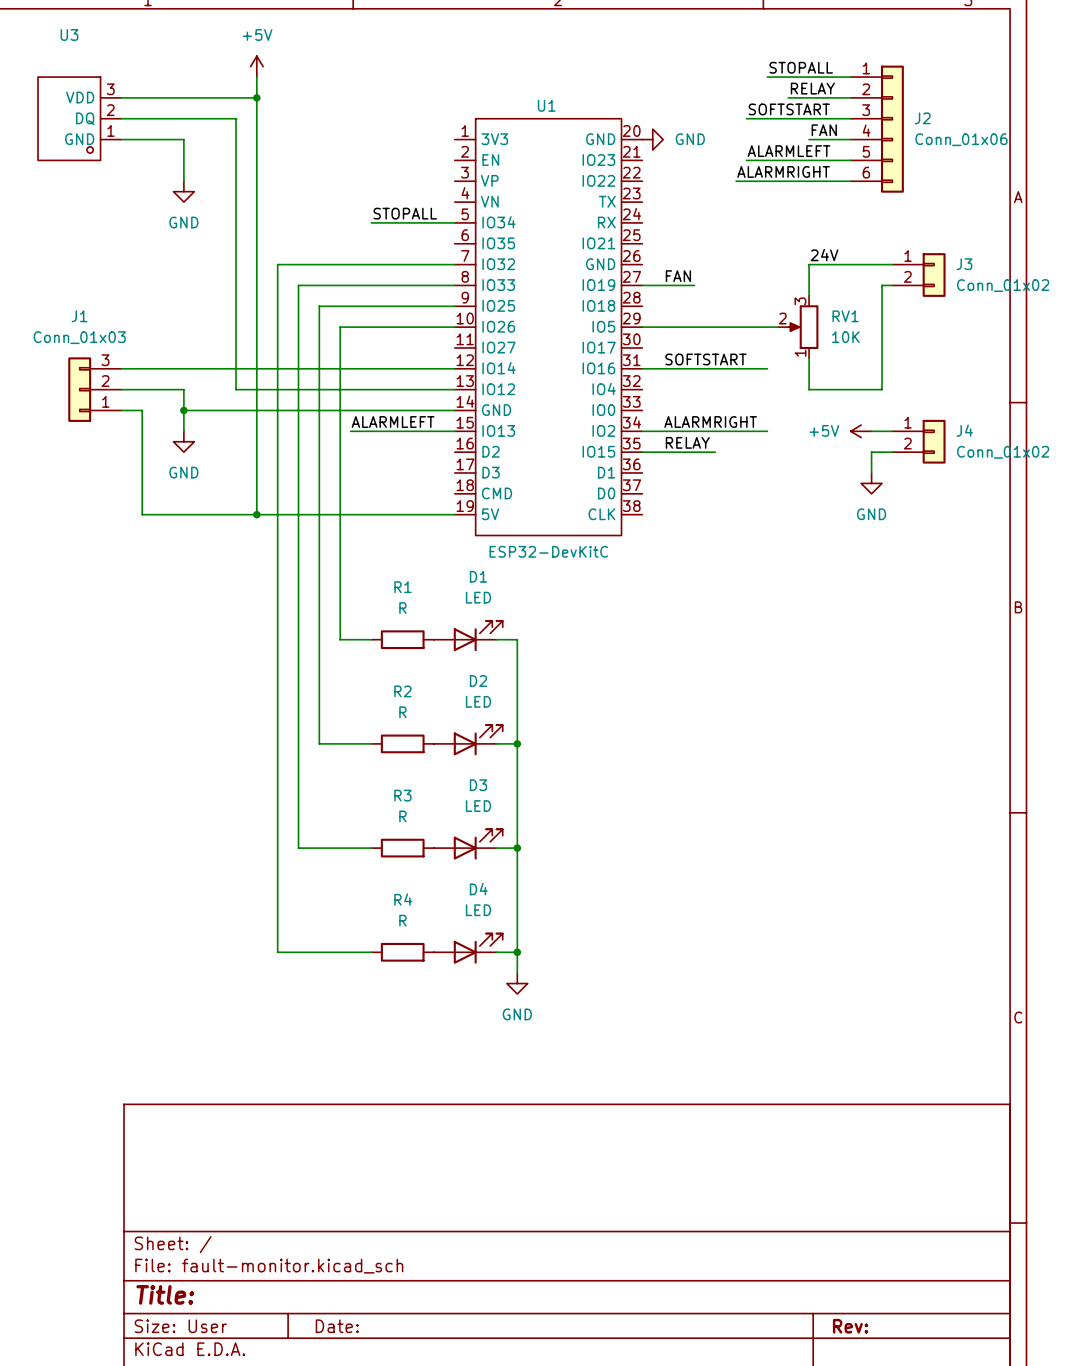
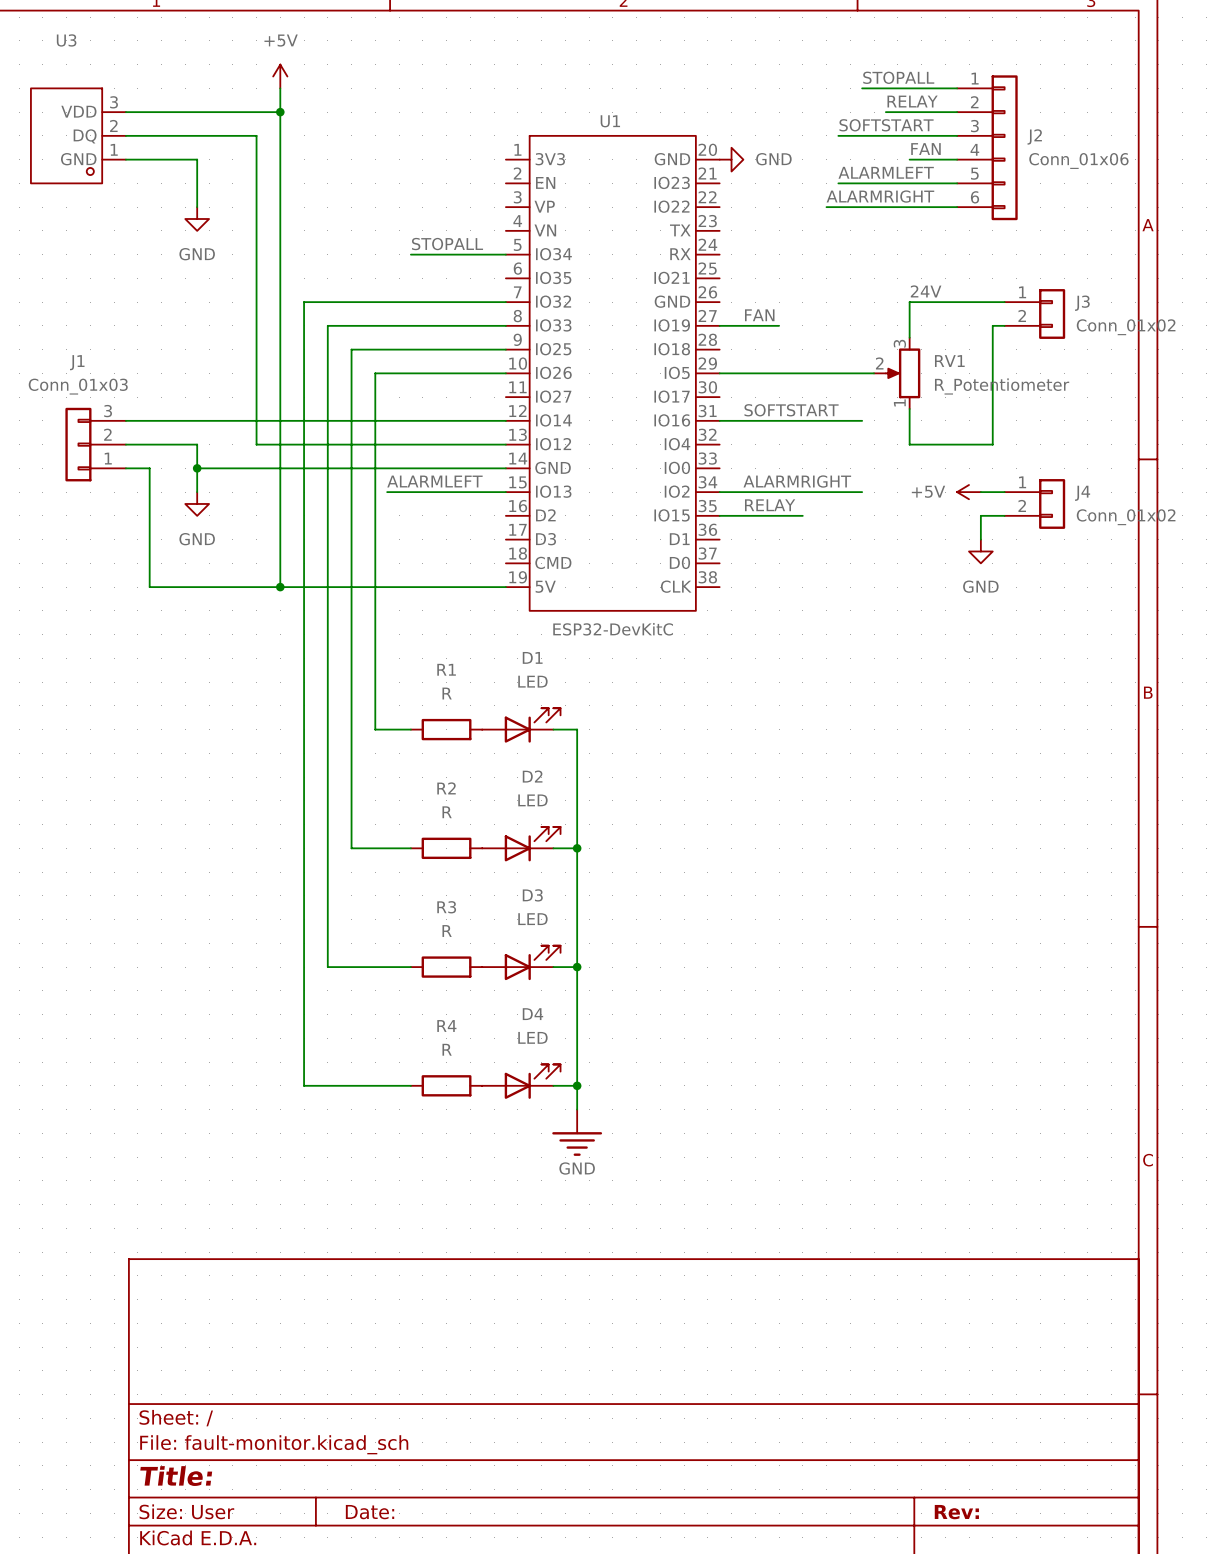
RV1 value: 10K (845, 337) -> R_Potentiometer (1002, 386)
power symbol: GND (517, 983) -> none
power symbol: none -> GND (577, 1132)

